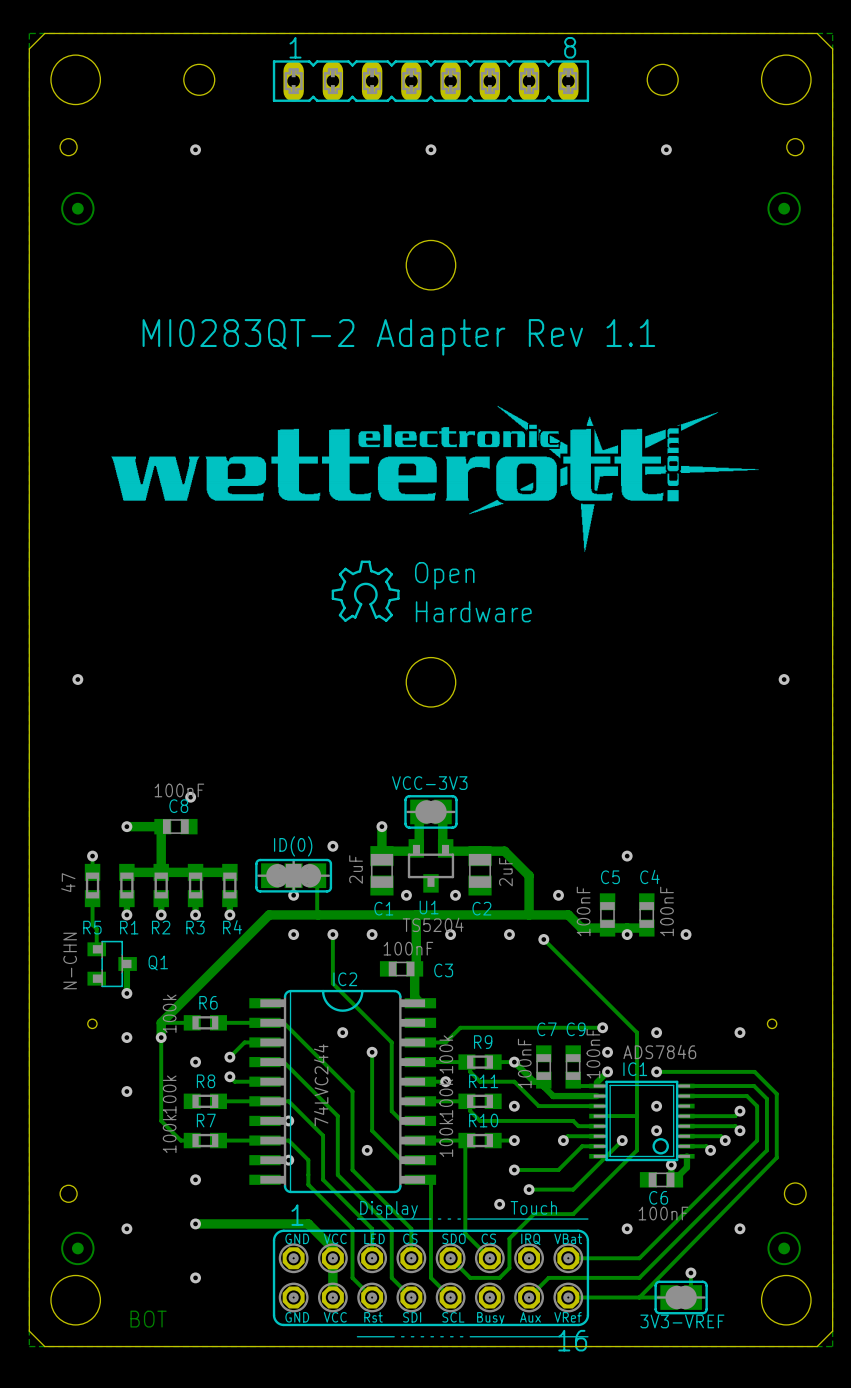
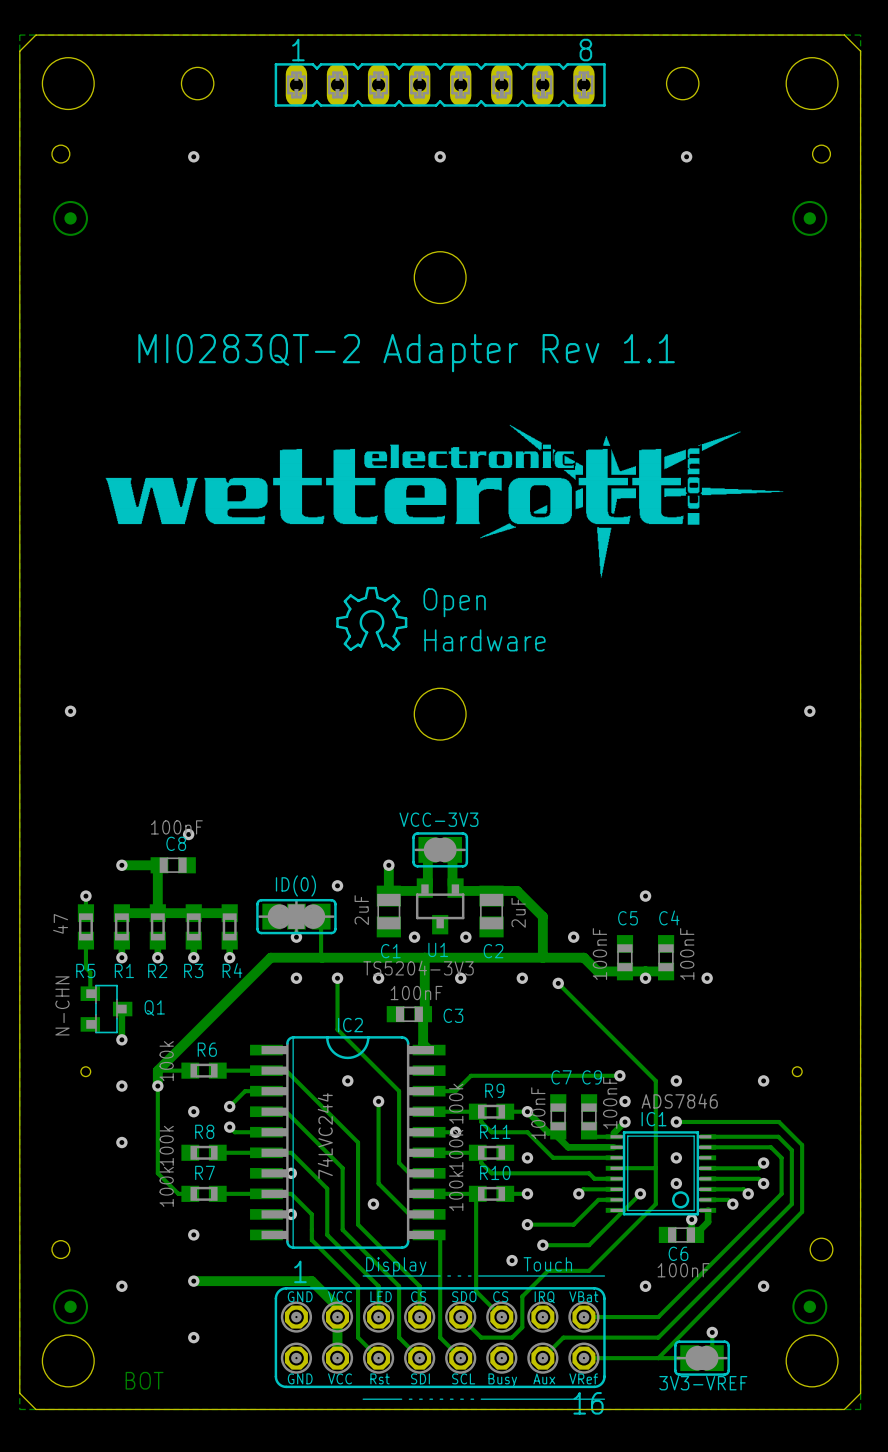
U1 value: TS5204 (433, 924) -> TS5204-3V3 (418, 968)

